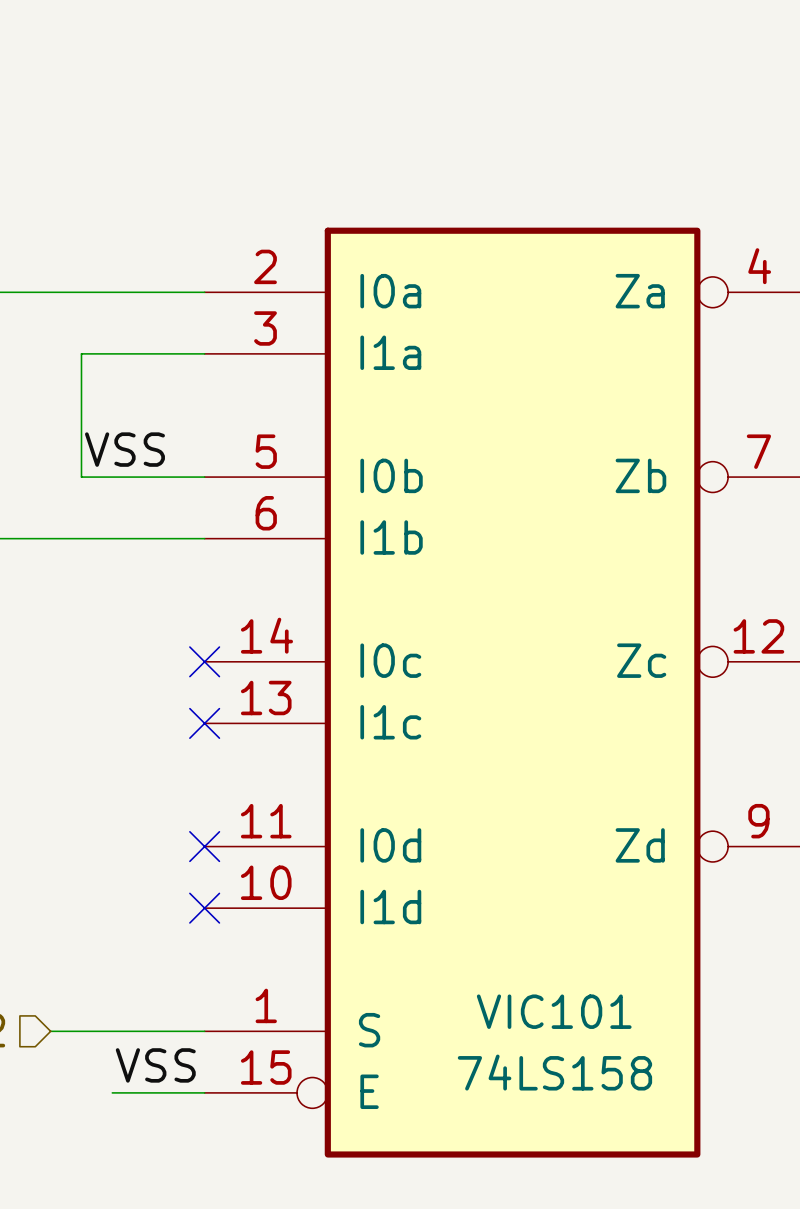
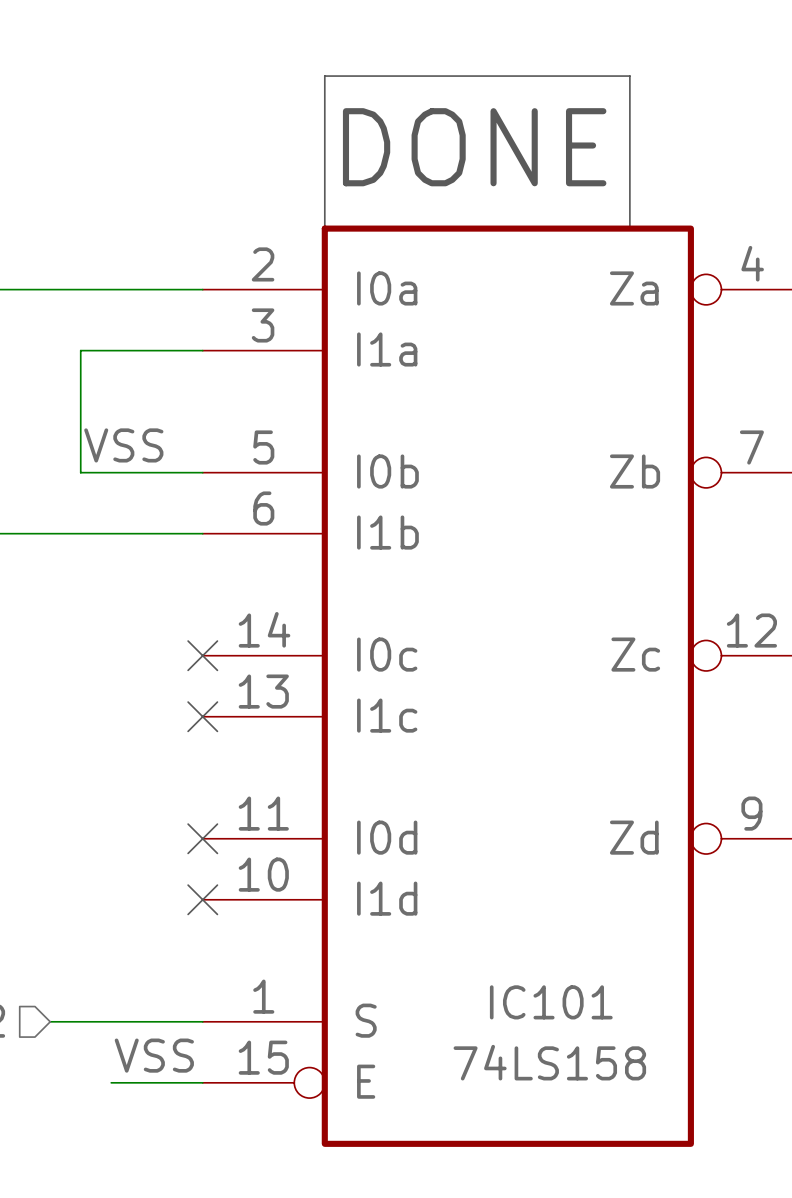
line: none -> (324, 76) (629, 76) (629, 228) (324, 228) (324, 76)
text: none -> DONE (474, 147)
VIC101 name: VIC101 (554, 1011) -> IC101 (551, 1002)

